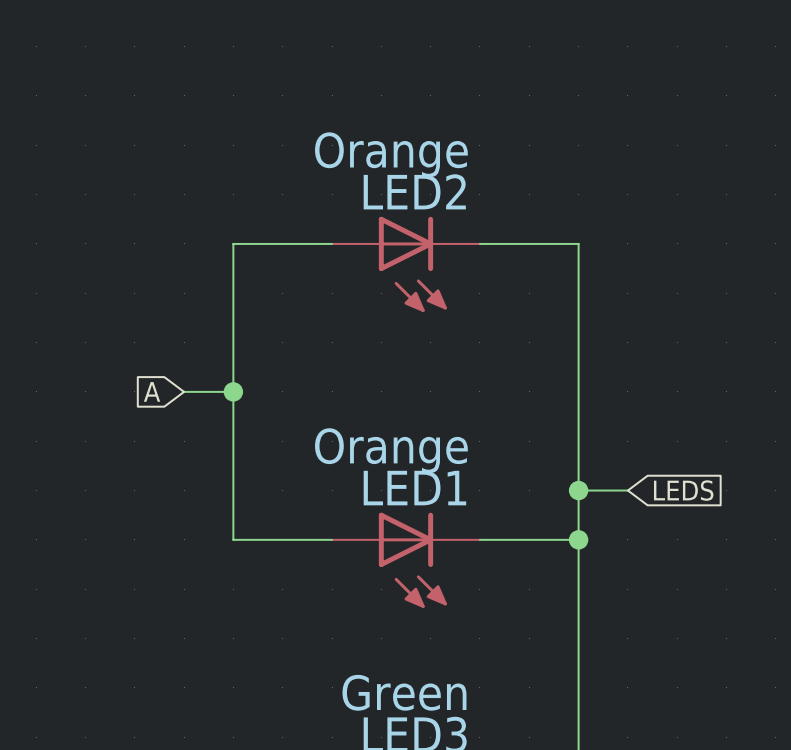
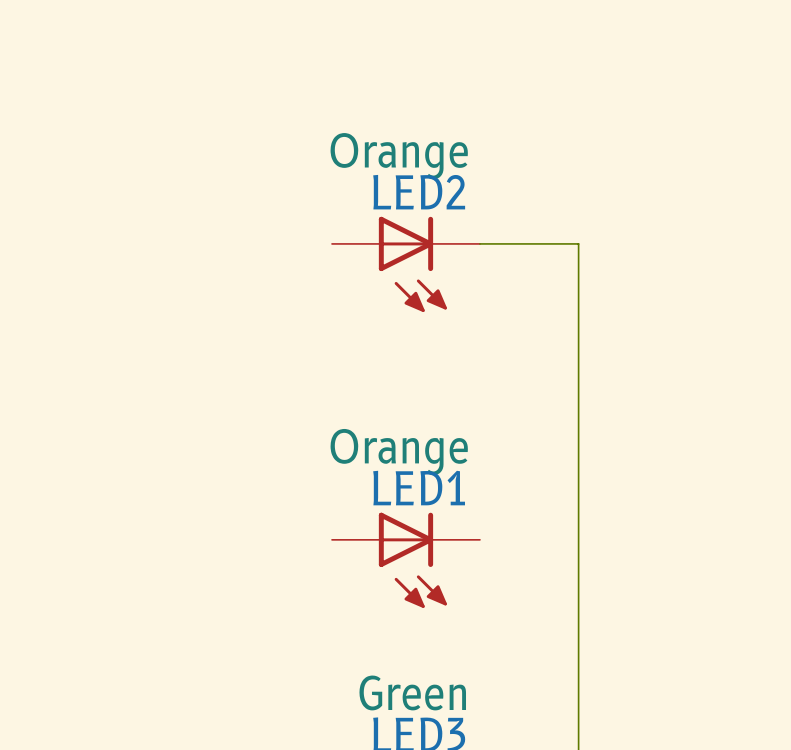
wire: (332, 243) (233, 243) (233, 539) (332, 539) -> none
global label: A (152, 391) -> none
wire: (184, 391) (233, 391) -> none
junction: (233, 391) -> none
wire: (578, 490) (627, 490) -> none
junction: (578, 490) -> none
global label: LEDS (683, 490) -> none
wire: (479, 539) (578, 539) -> none
junction: (578, 539) -> none

